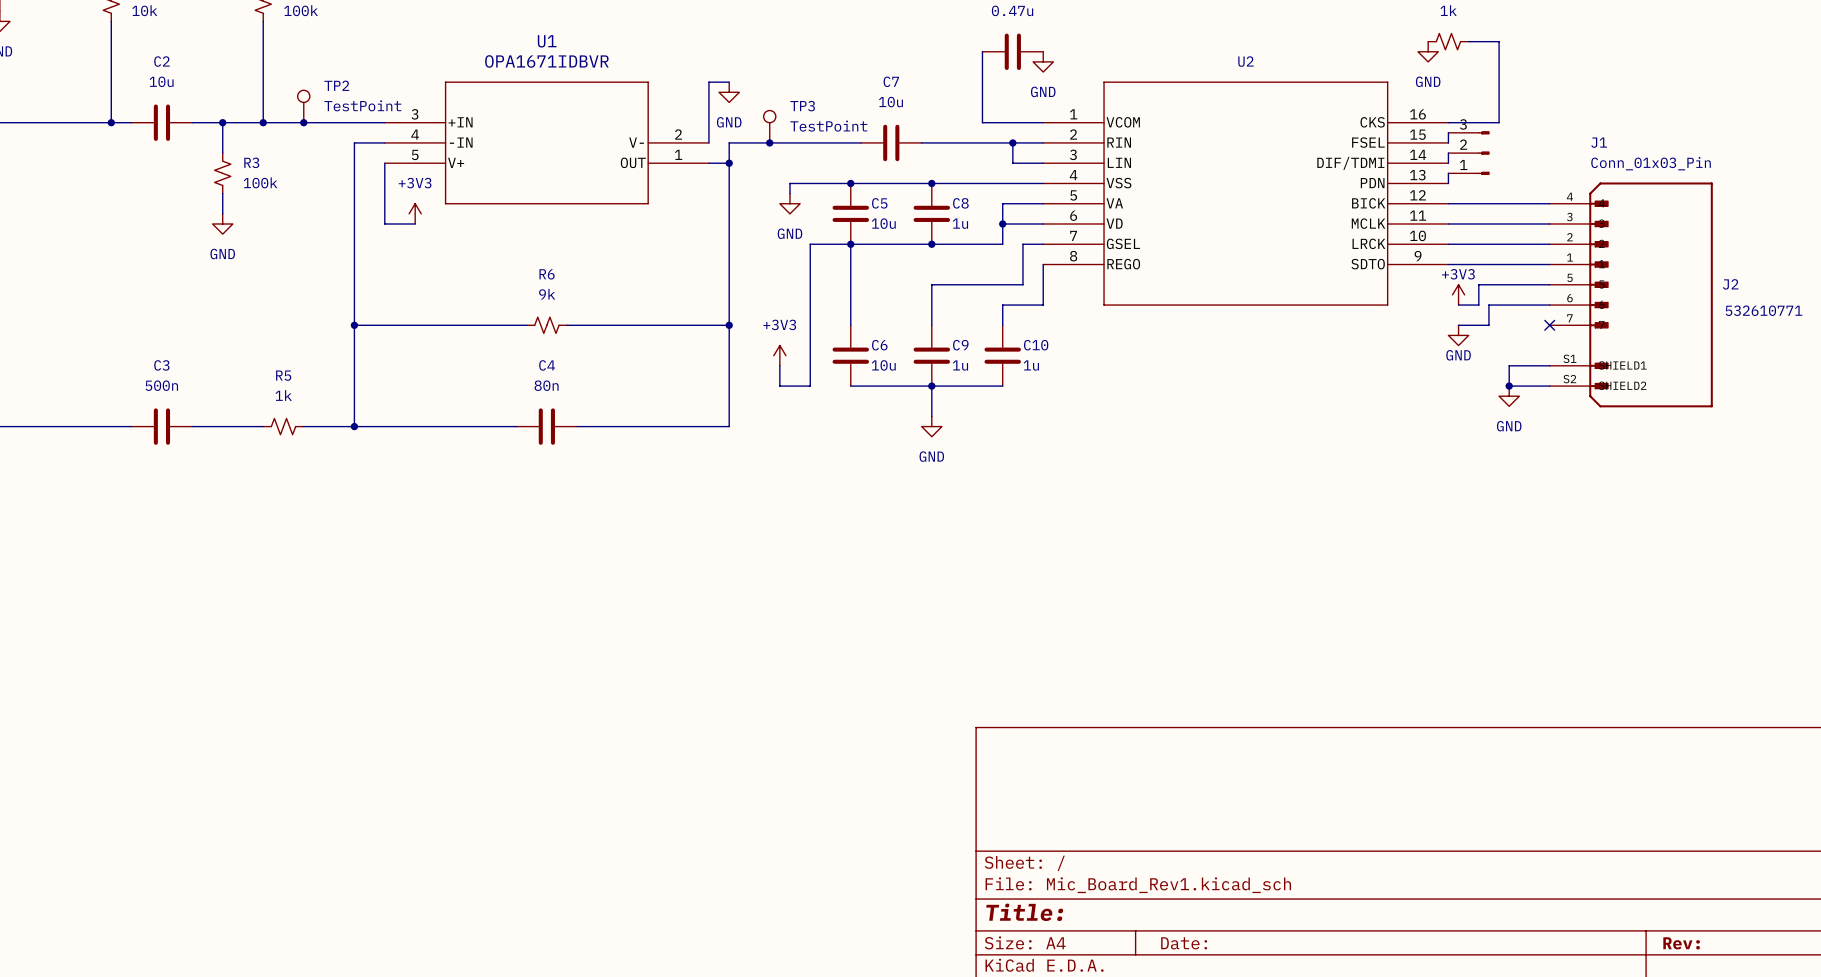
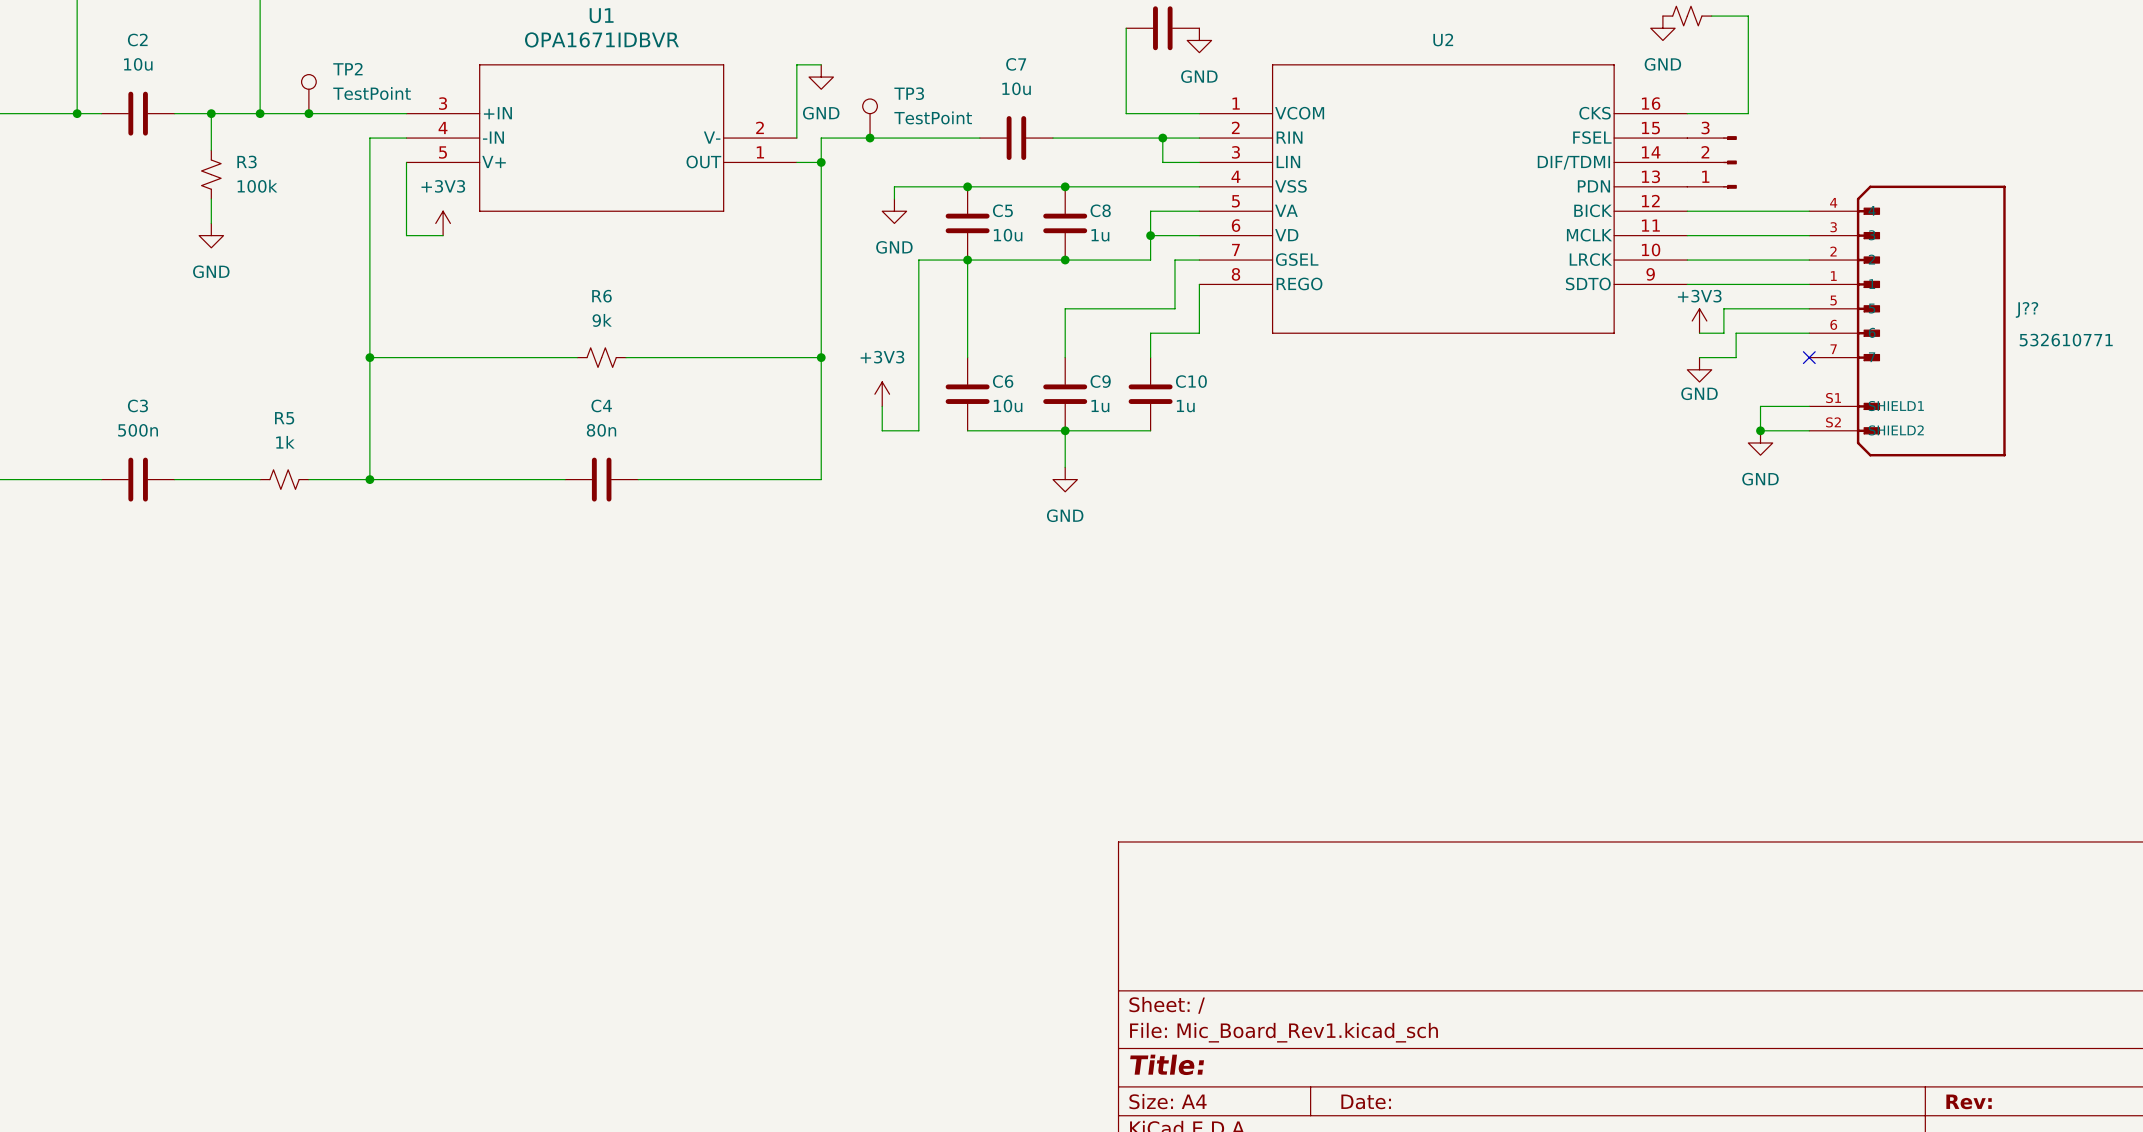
wire: (1448, 132) (1448, 142) -> none
wire: (1448, 153) (1448, 163) -> none
J1: Conn_01x03_Pin (1468, 153) -> none
part: none -> (1712, 162)
wire: (1448, 173) (1448, 183) -> none
J2 name: J2 (1730, 284) -> J?? (2027, 309)

